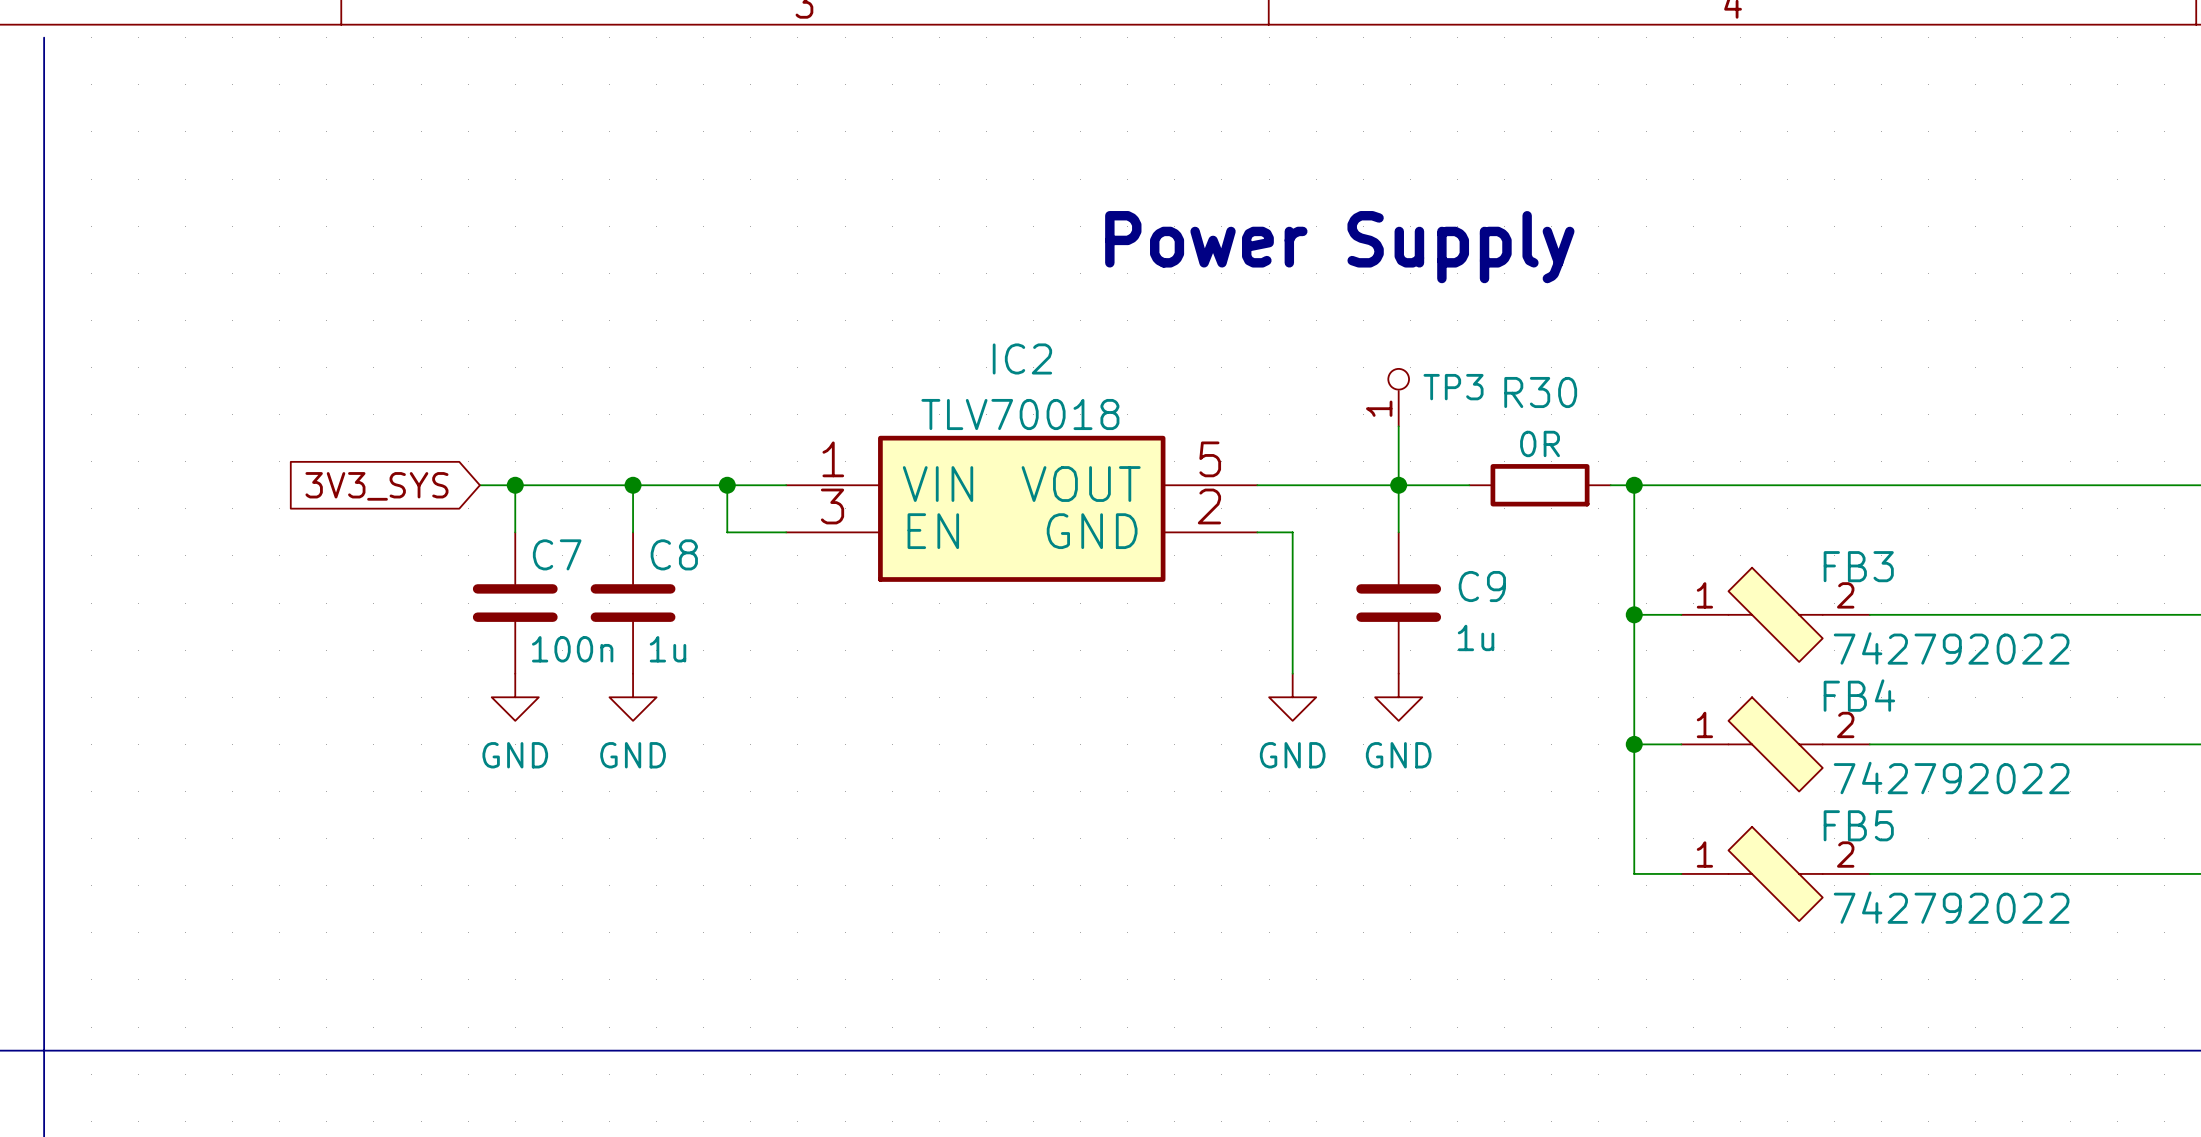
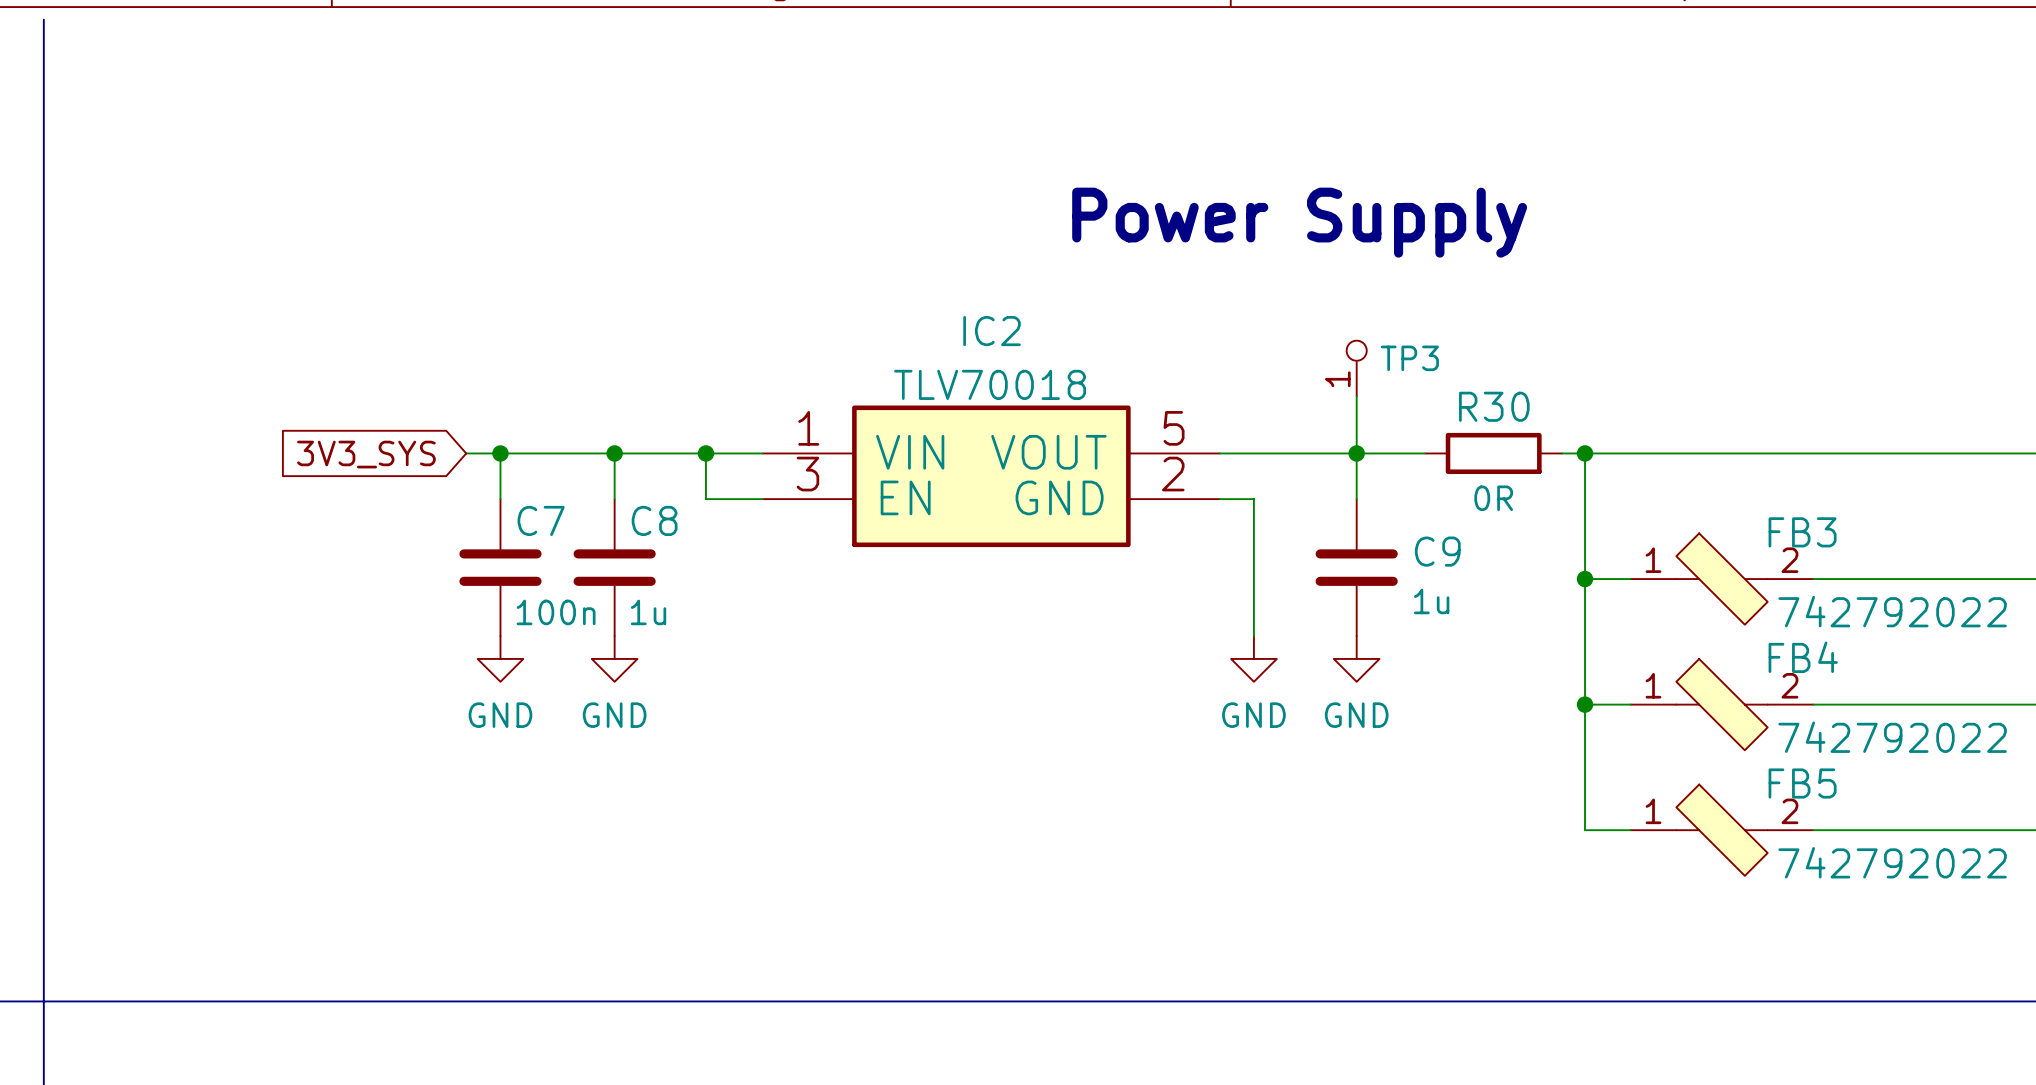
R30 name position: R30 (1540, 392) -> R30 (1494, 406)
R30 text position: 0R (1540, 443) -> 0R (1493, 498)

